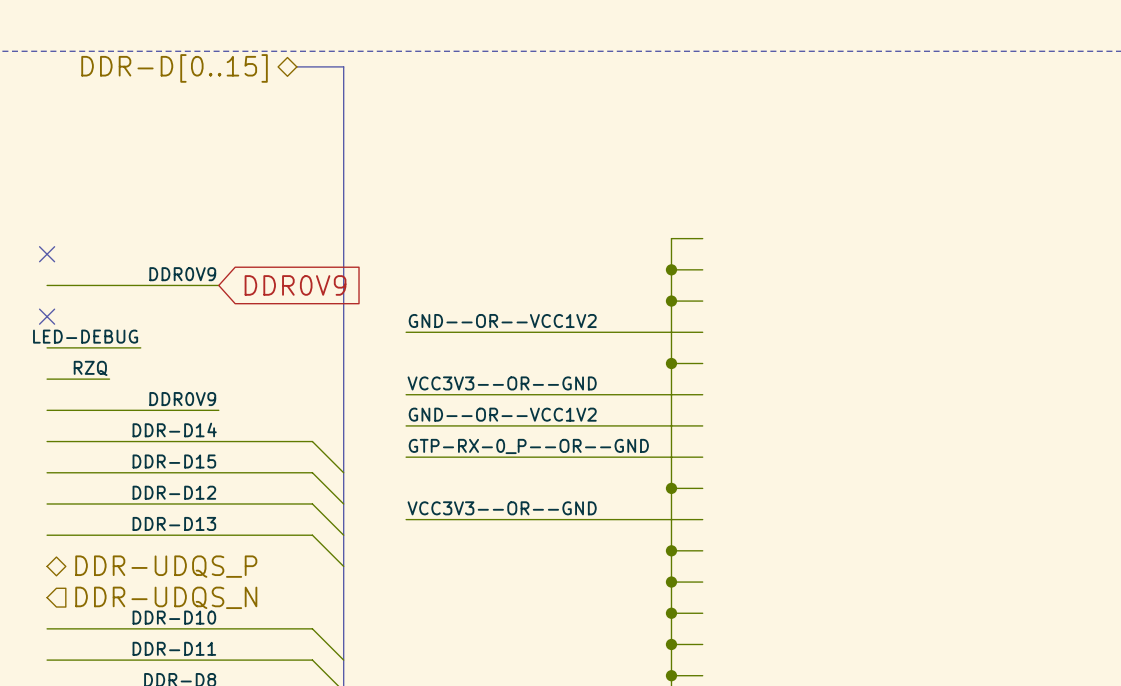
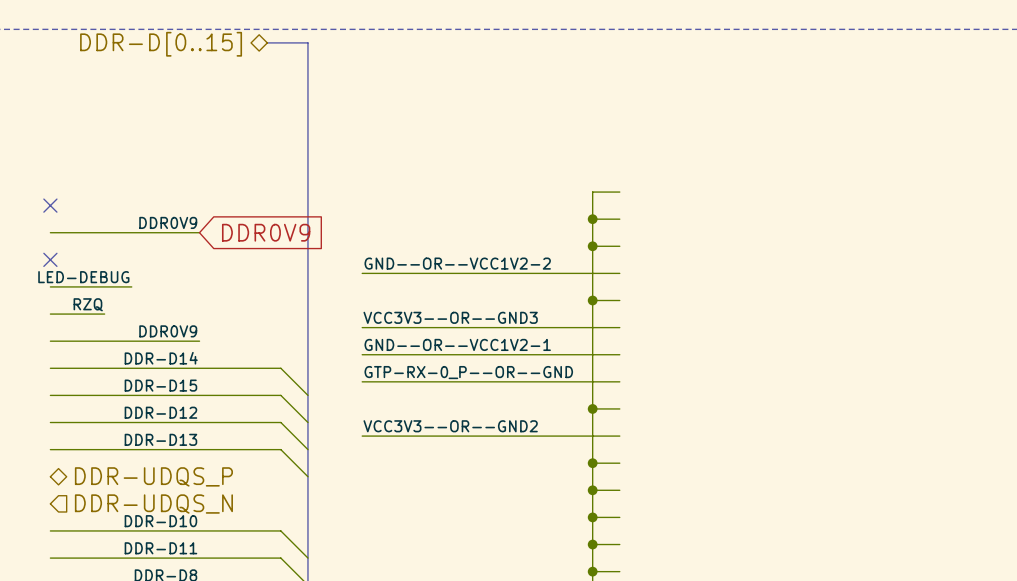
label: GND--OR--VCC1V2 (502, 321) -> GND--OR--VCC1V2-2 (457, 263)
label: VCC3V3--OR--GND (502, 383) -> VCC3V3--OR--GND3 (450, 317)
label: GND--OR--VCC1V2 (502, 414) -> GND--OR--VCC1V2-1 (457, 344)
label: VCC3V3--OR--GND (502, 508) -> VCC3V3--OR--GND2 (450, 426)

